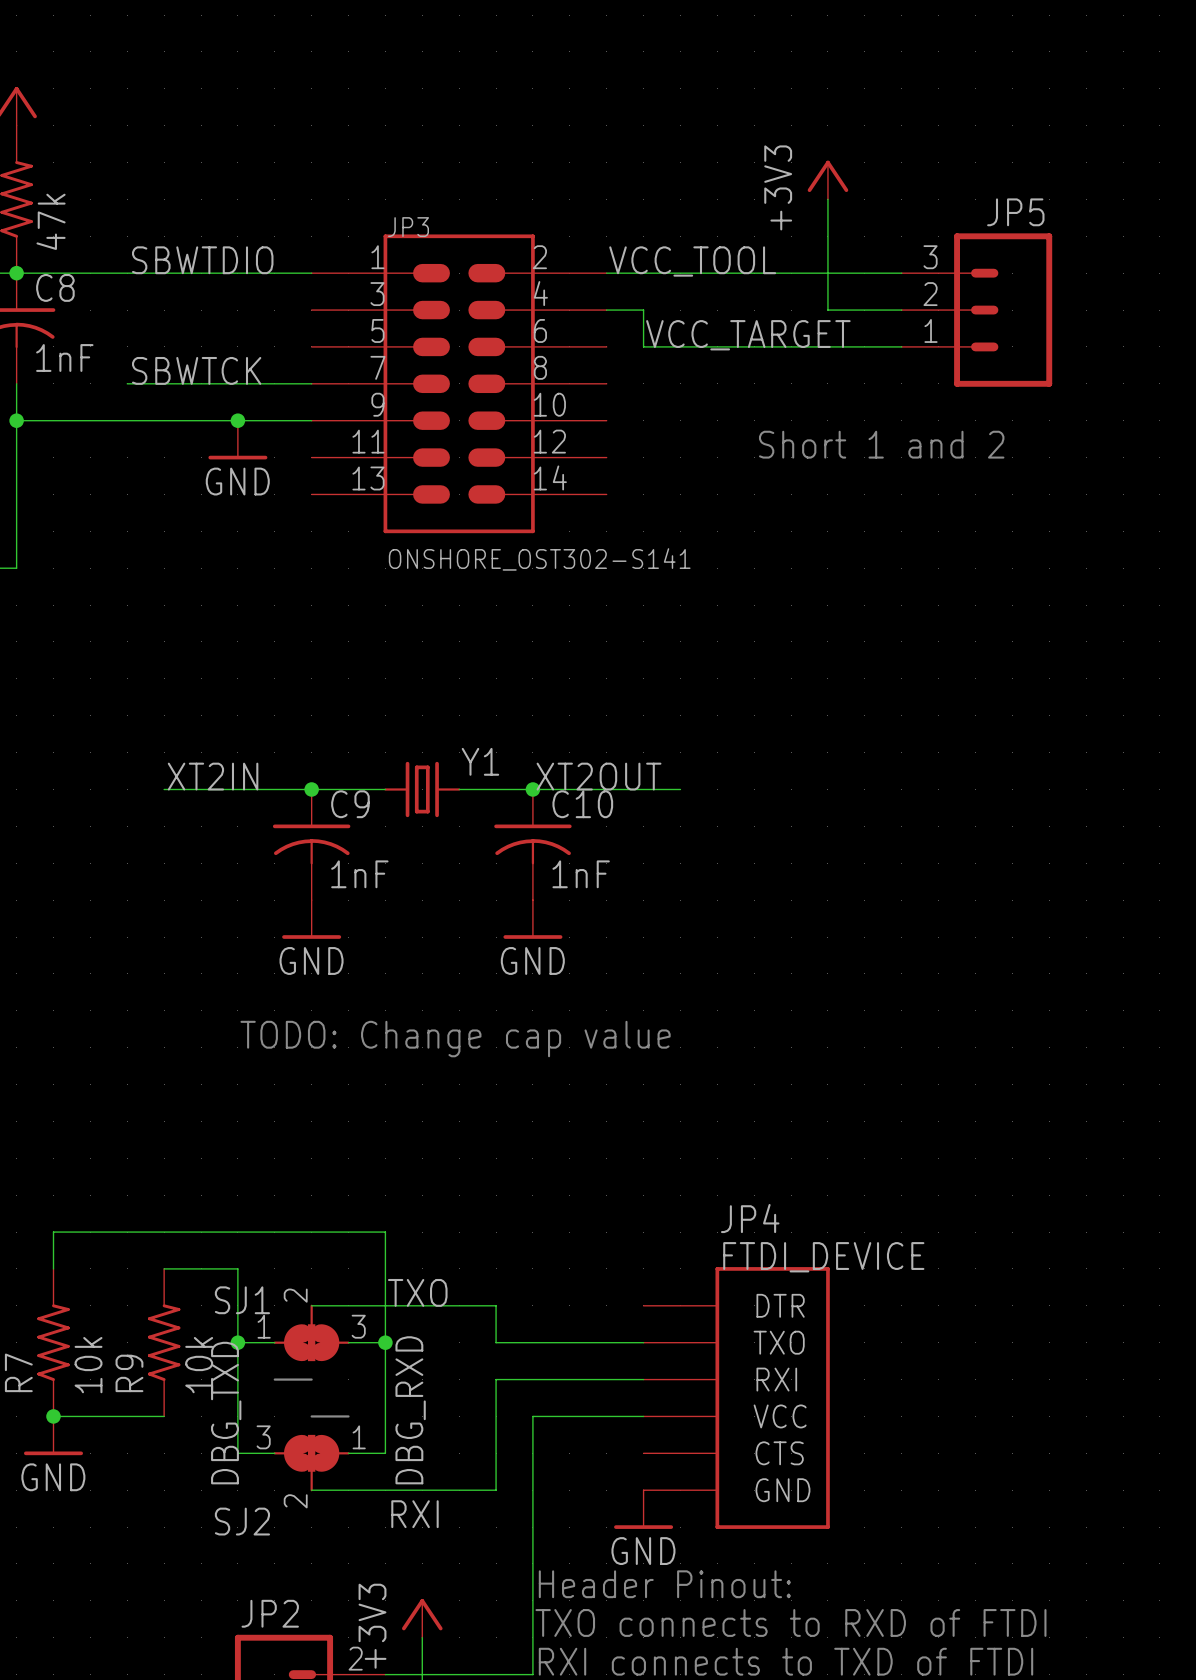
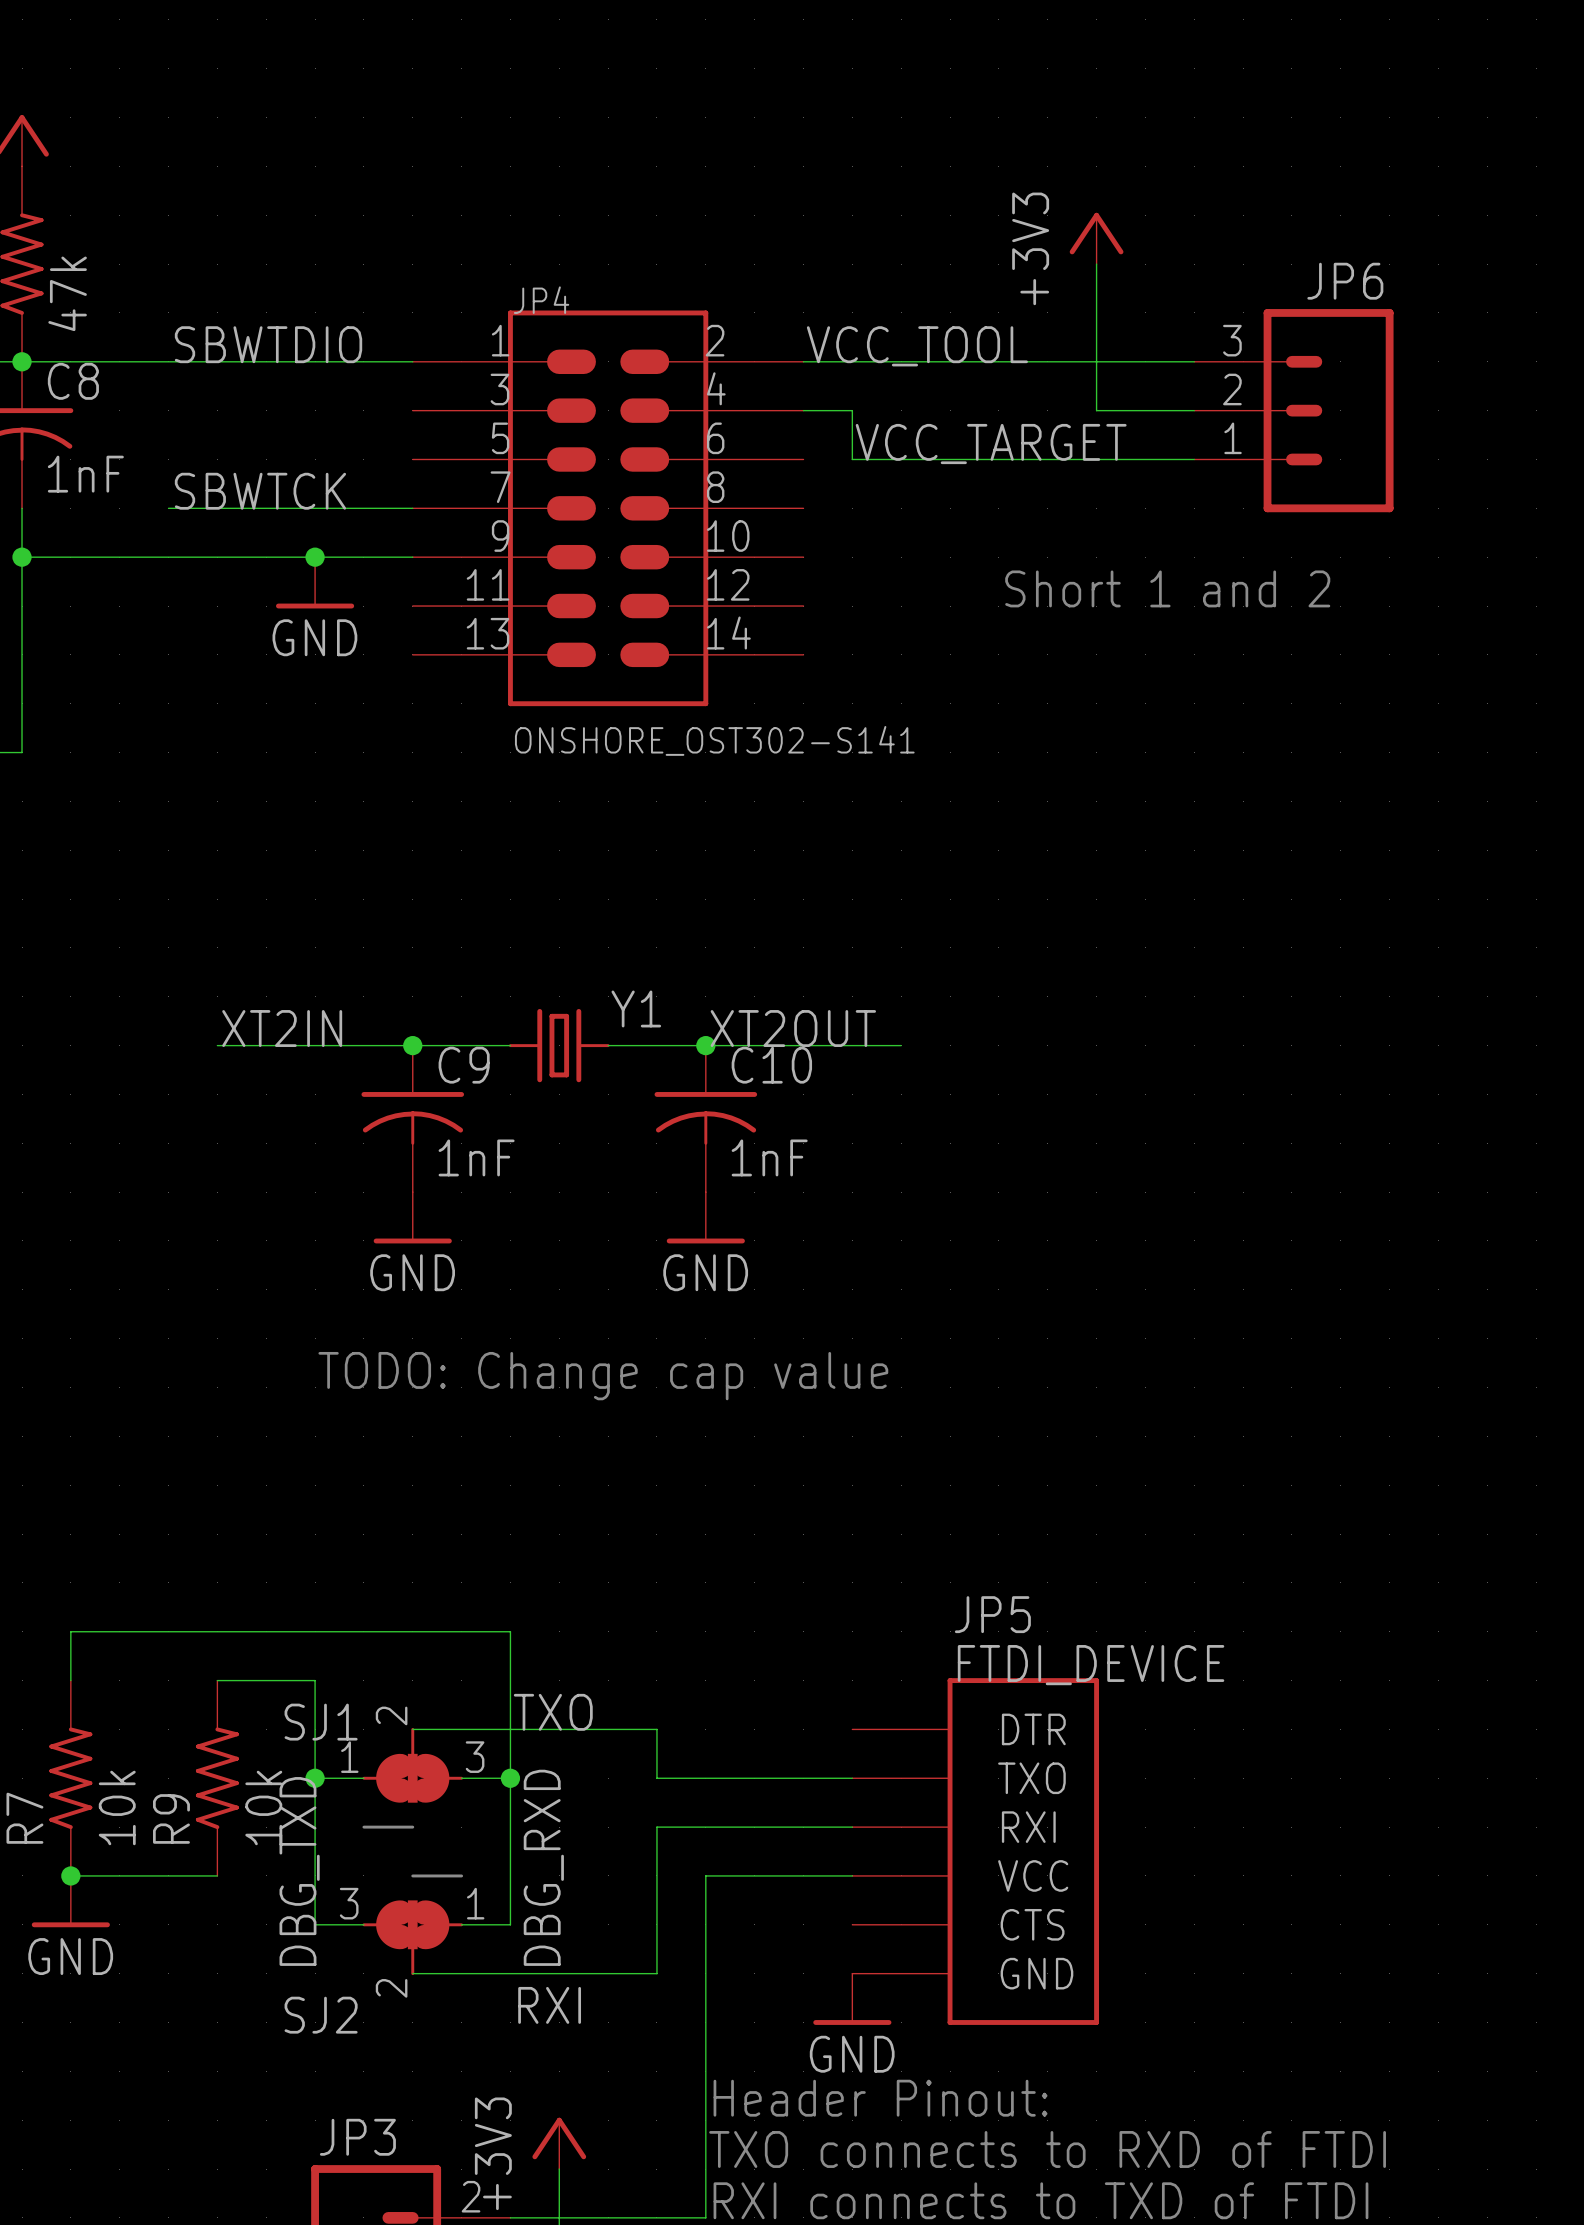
JP5 name: JP5 (1015, 212) -> JP6 (1345, 281)
JP3 name: JP3 (408, 227) -> JP4 (541, 300)
JP4 name: JP4 (750, 1218) -> JP5 (992, 1614)
JP2 name: JP2 (270, 1613) -> JP3 (357, 2137)

